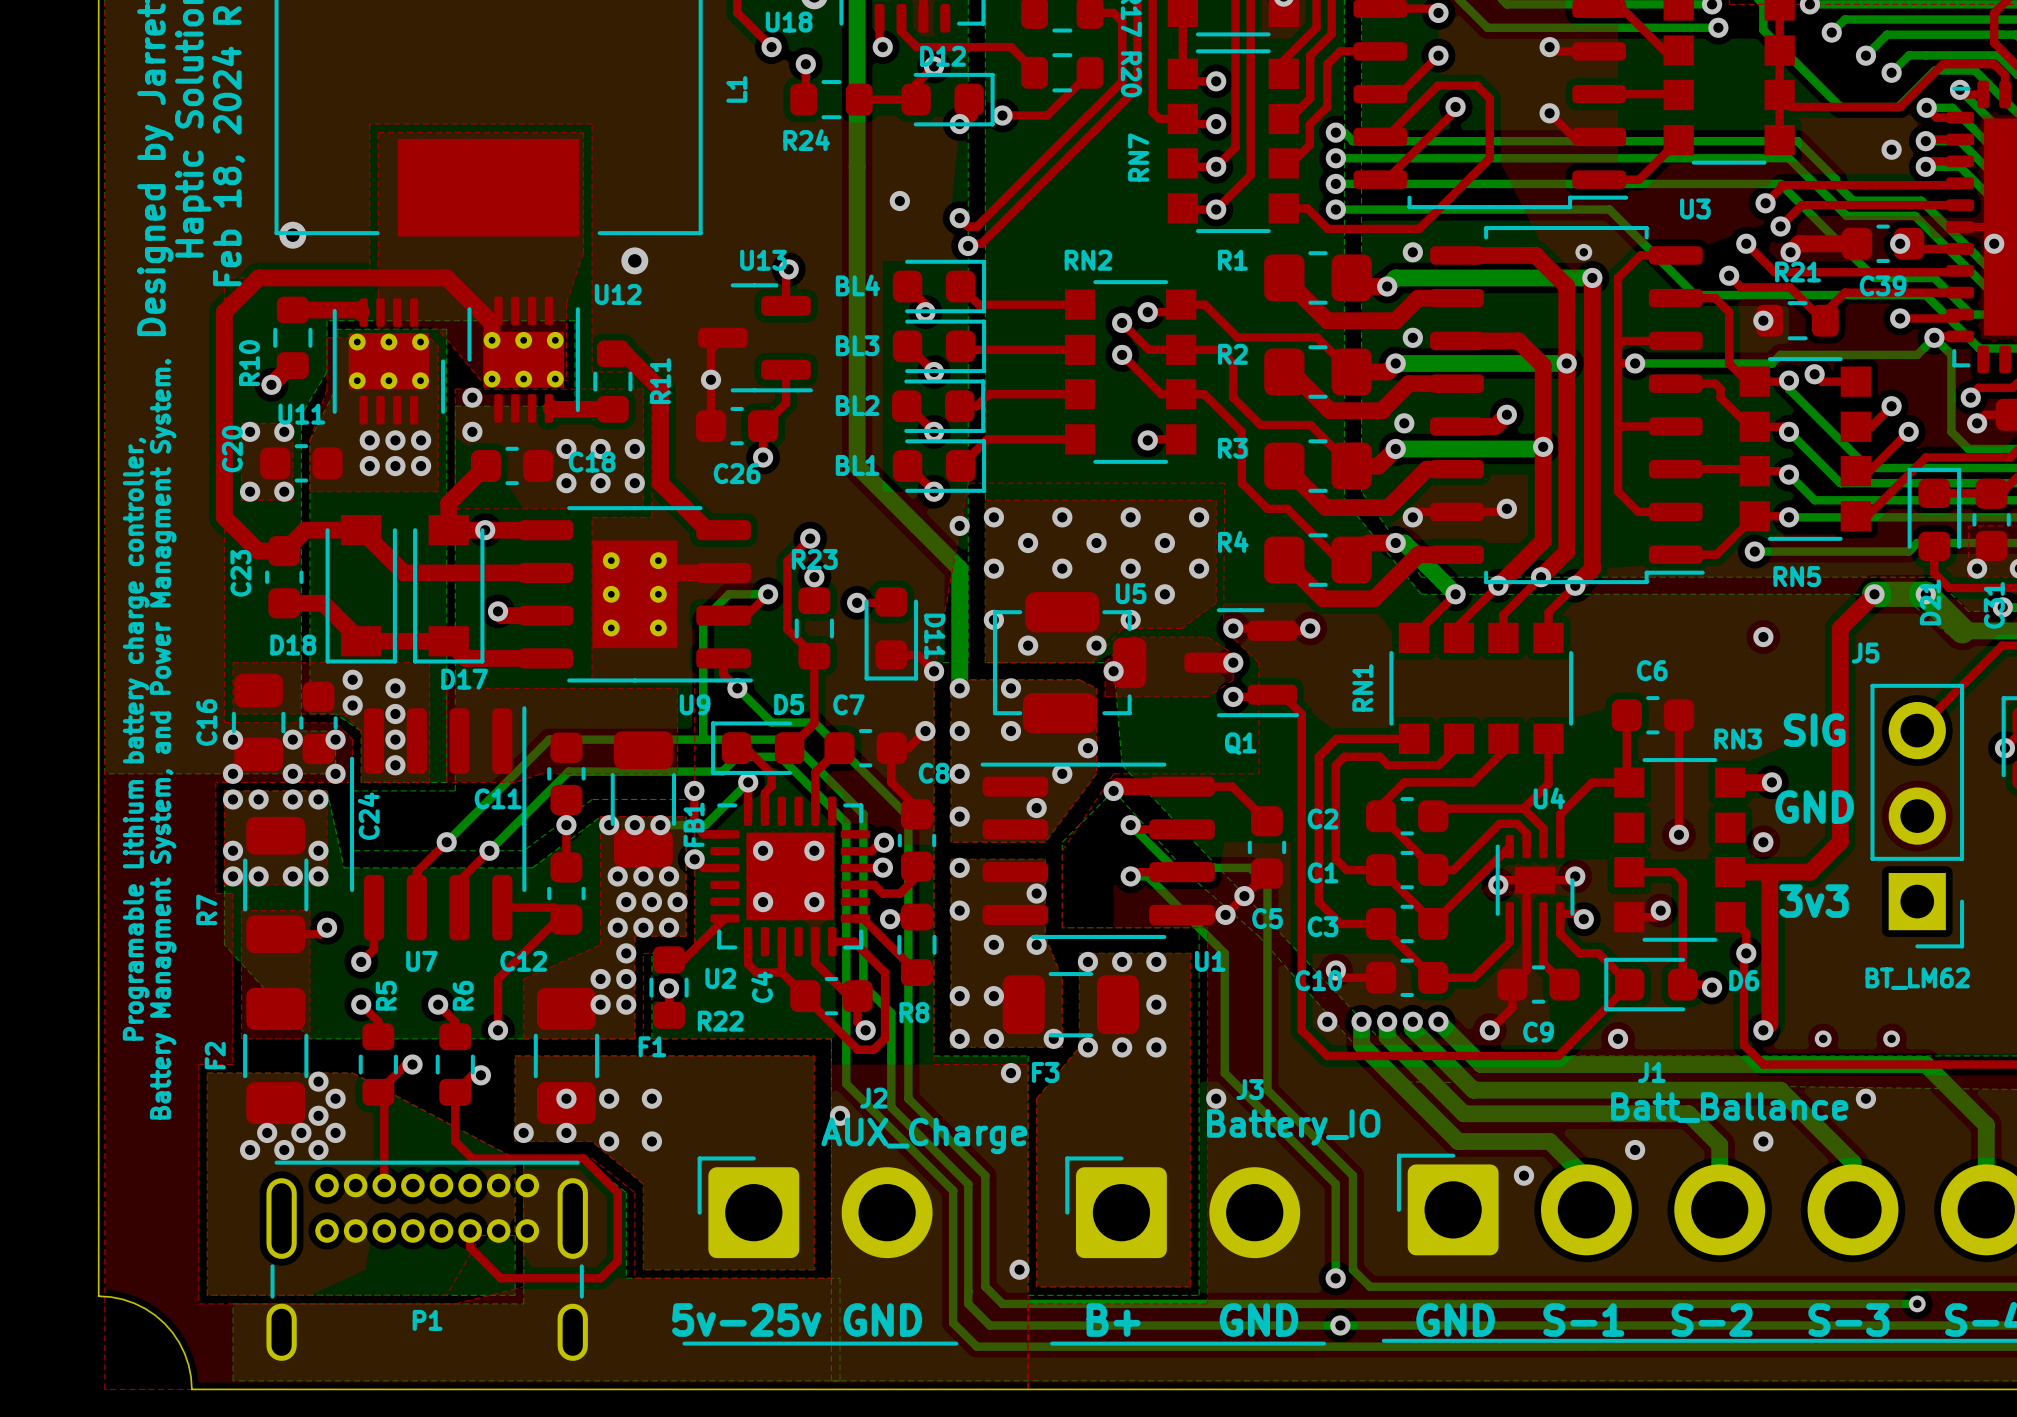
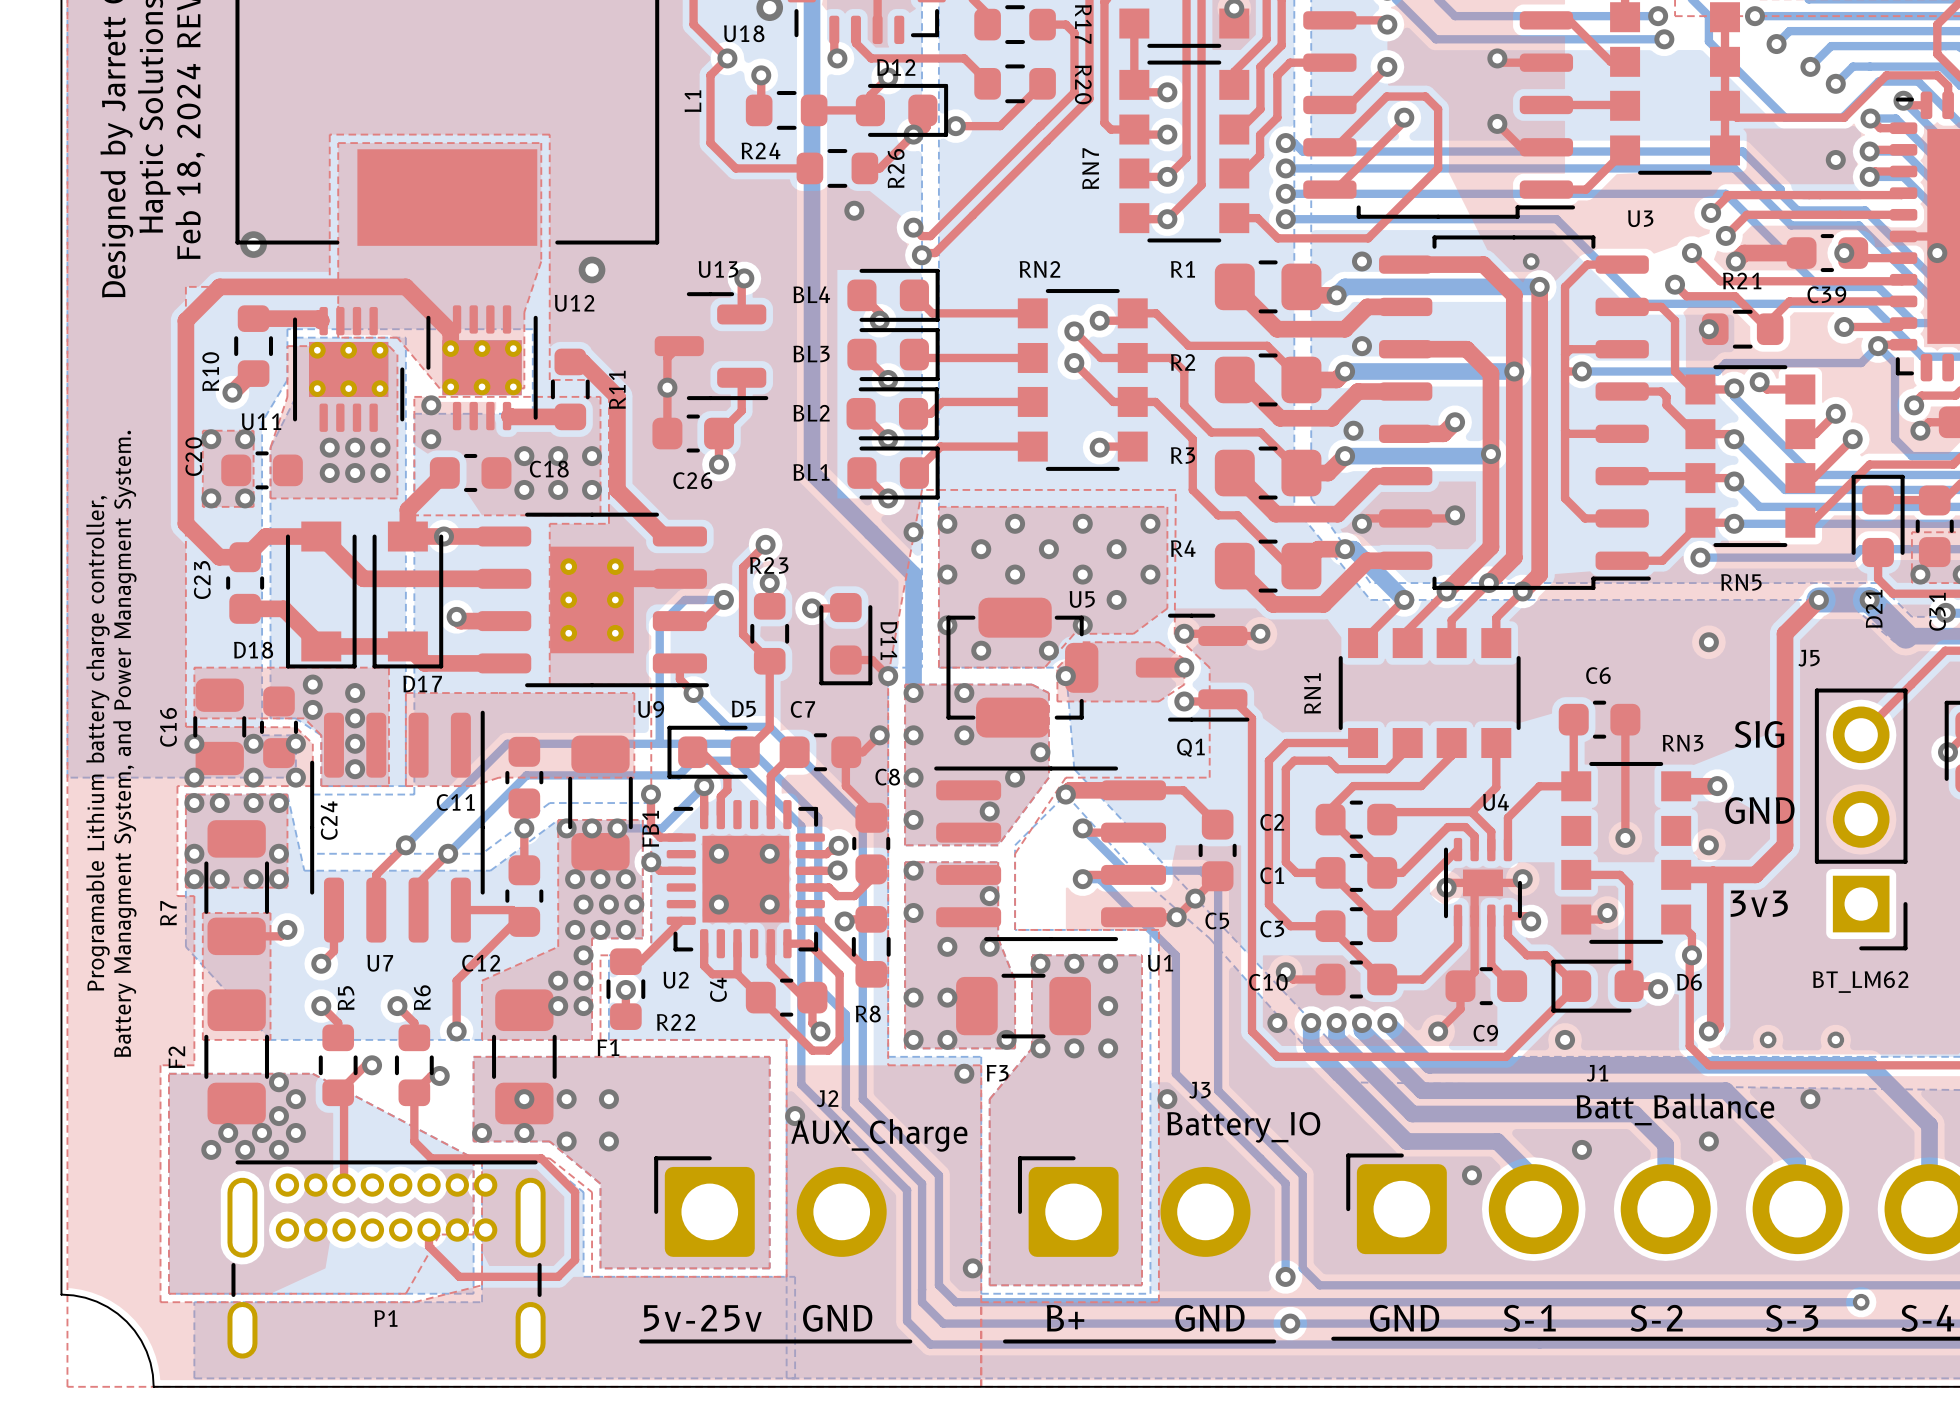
top track: none -> (727, 58) (710, 75) (710, 143) (735, 168) (809, 168)
top track: none -> (913, 134) (879, 168) (864, 168)
R26: none -> (837, 168)

